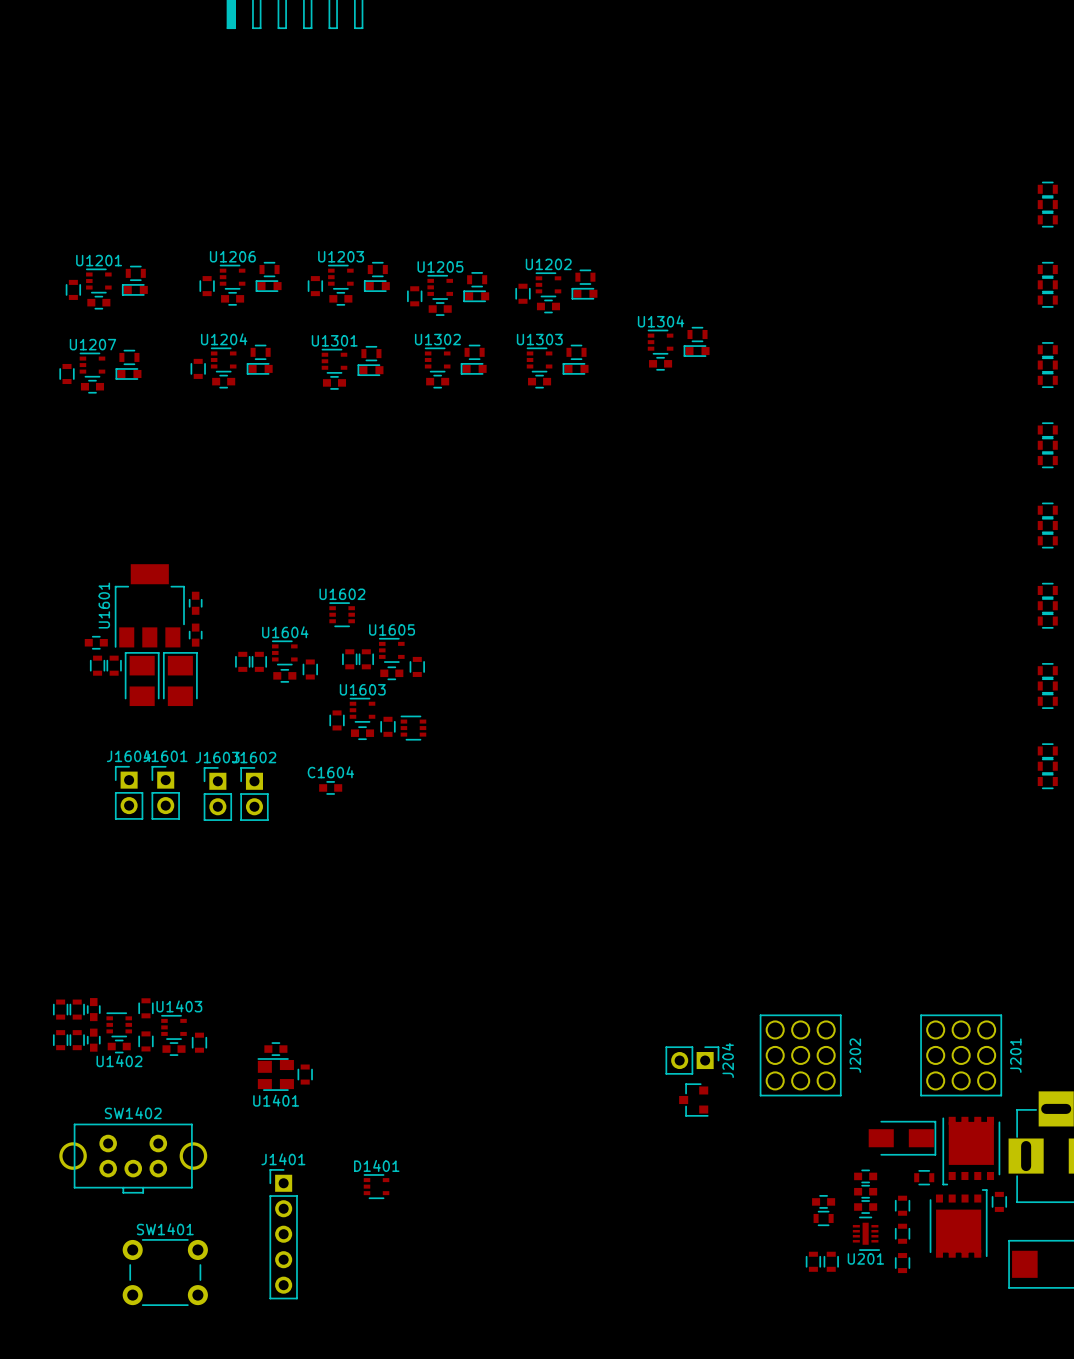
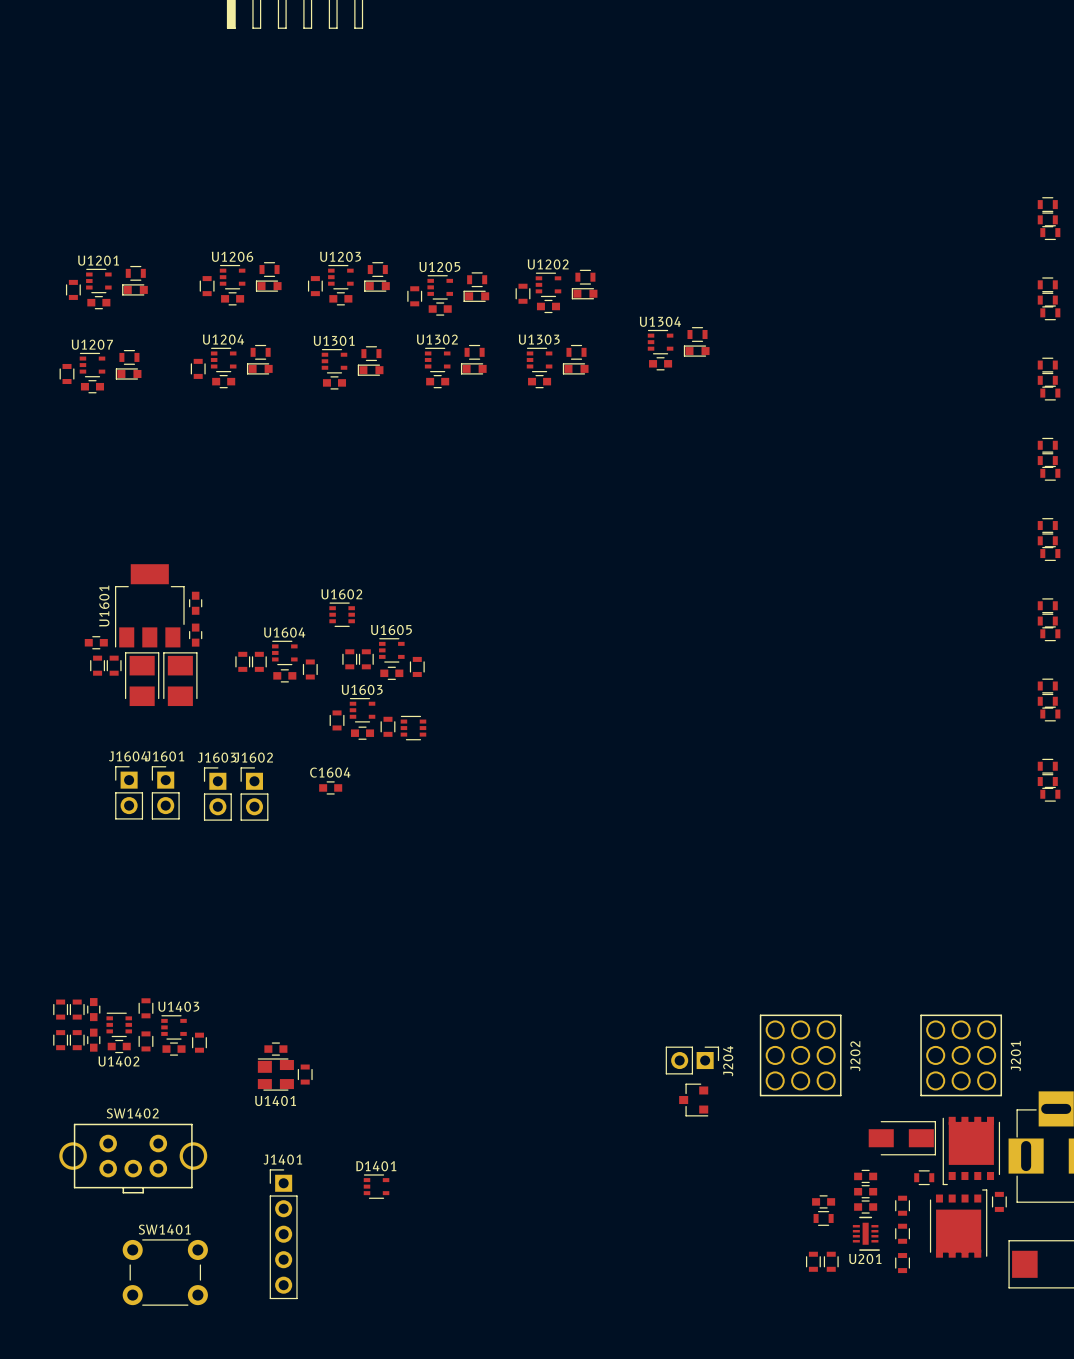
part: (1047, 189) -> none
part: none -> (1050, 232)
part: (1047, 269) -> none
part: none -> (1050, 312)
part: (1047, 349) -> none
part: none -> (1050, 393)
part: (1047, 430) -> none
part: none -> (1050, 473)
part: (1047, 510) -> none
part: none -> (1050, 553)
part: (1047, 590) -> none
part: none -> (1050, 633)
part: (1047, 670) -> none
part: none -> (1050, 714)
part: (1047, 750) -> none
part: none -> (1050, 794)

